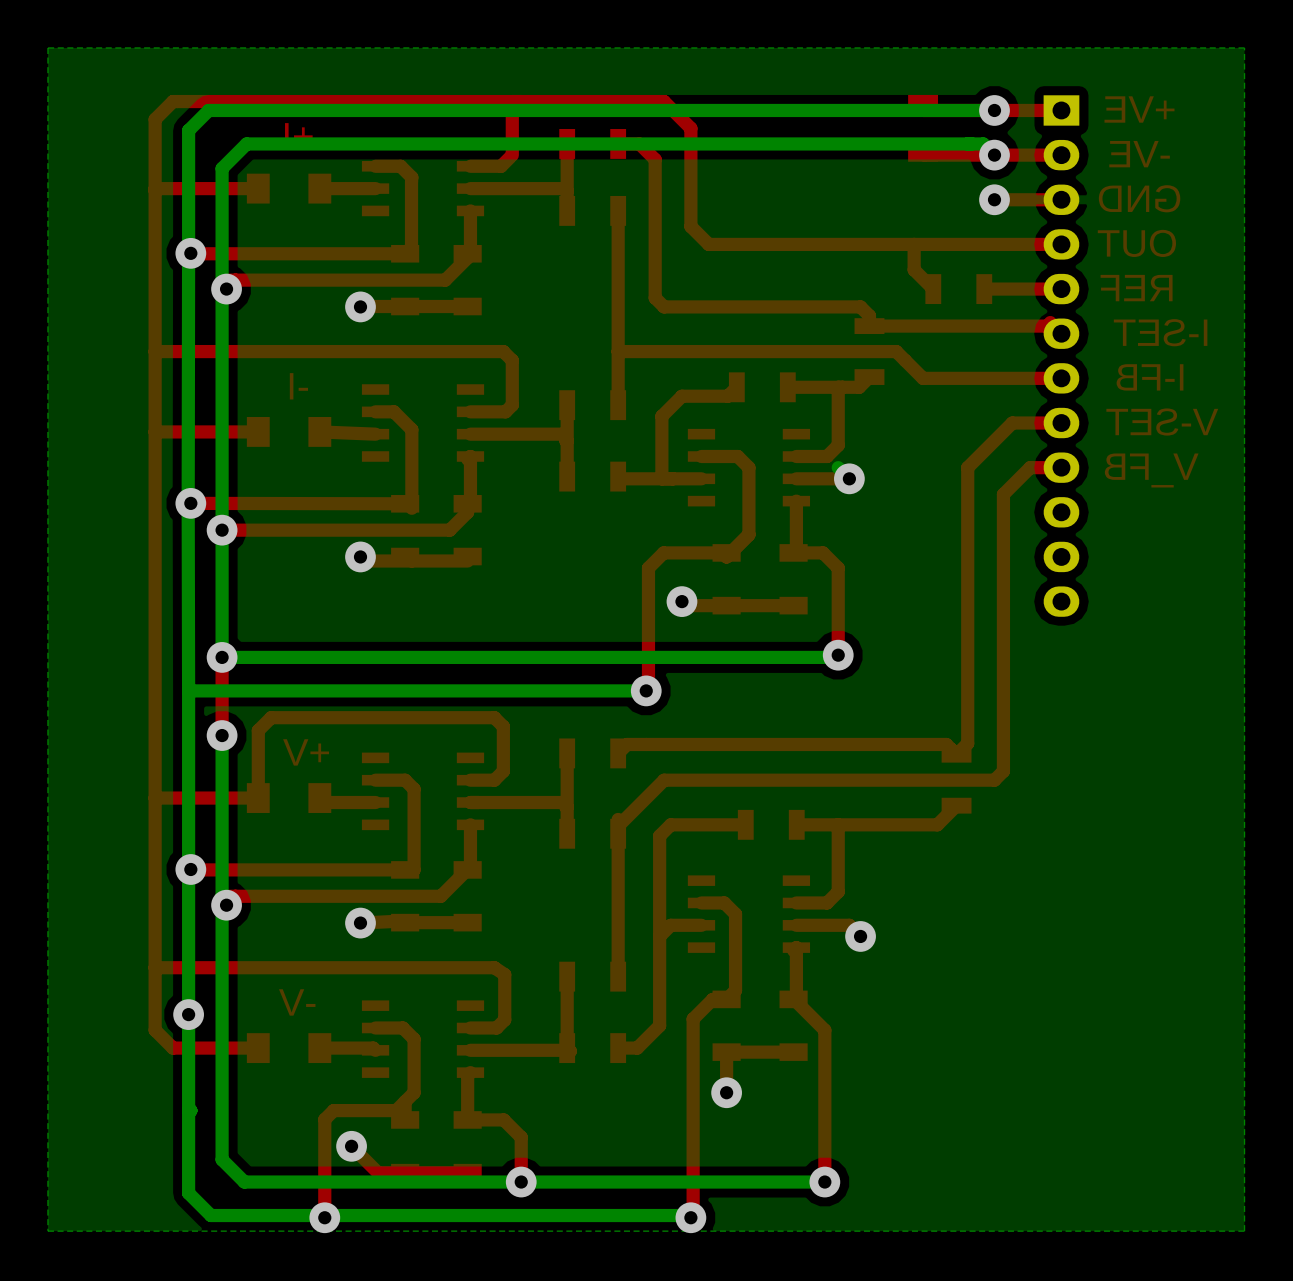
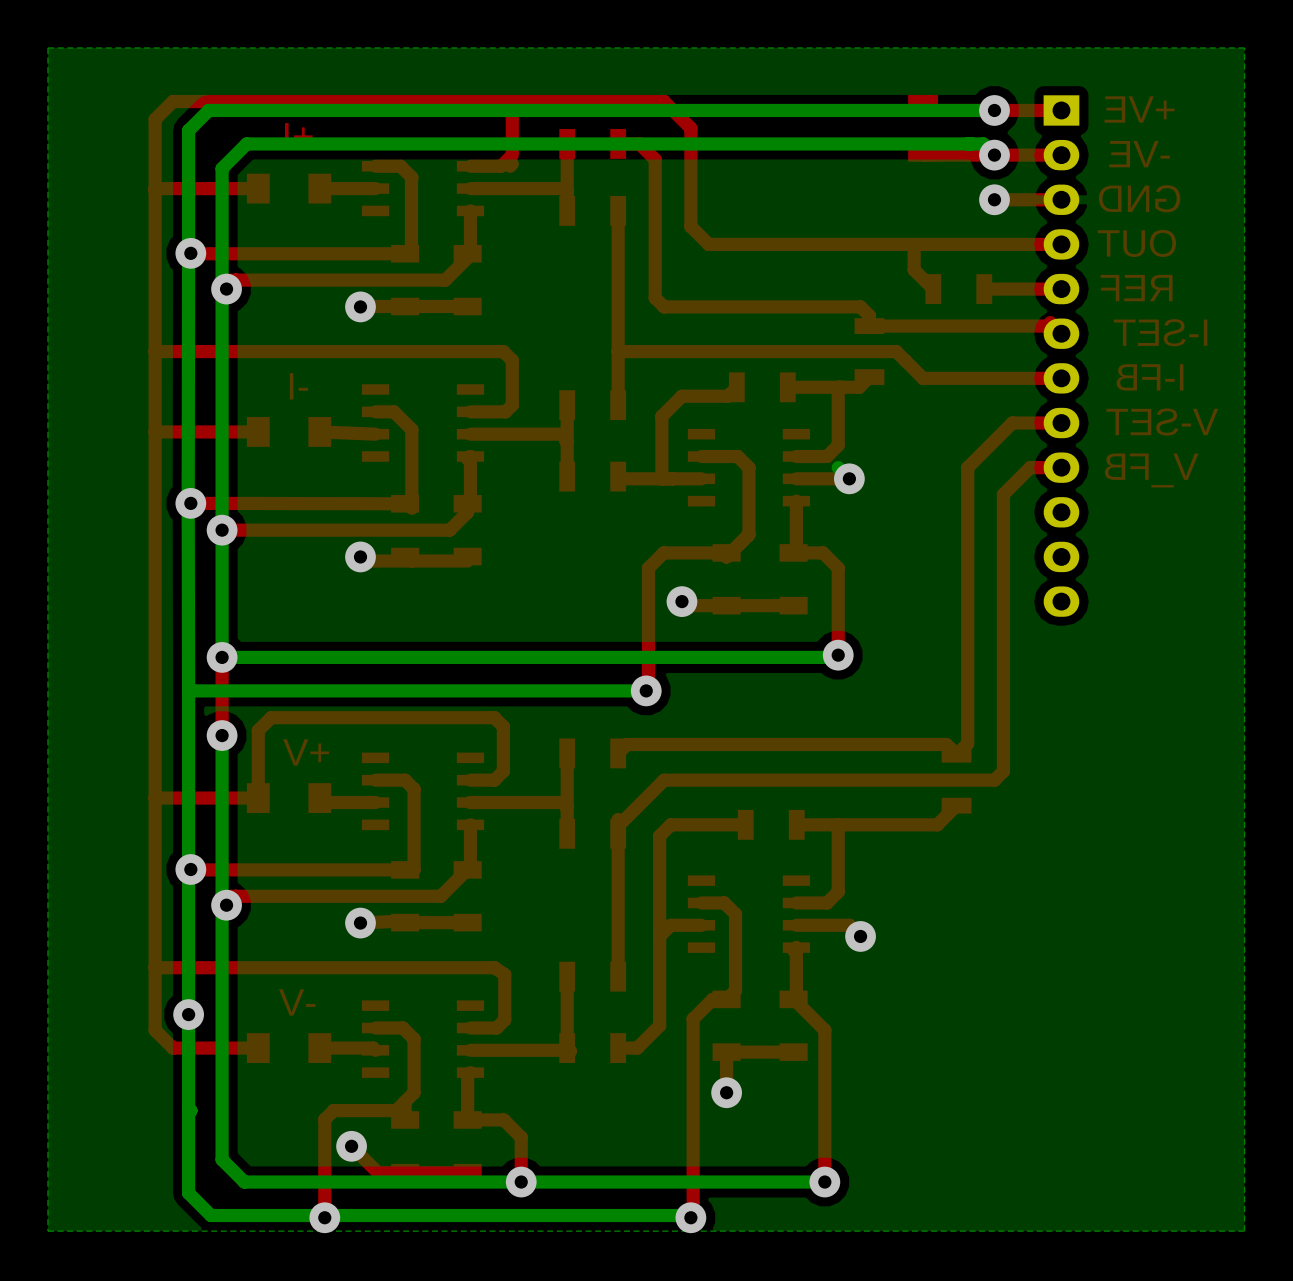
top track: none -> (512, 164) (510, 166)

